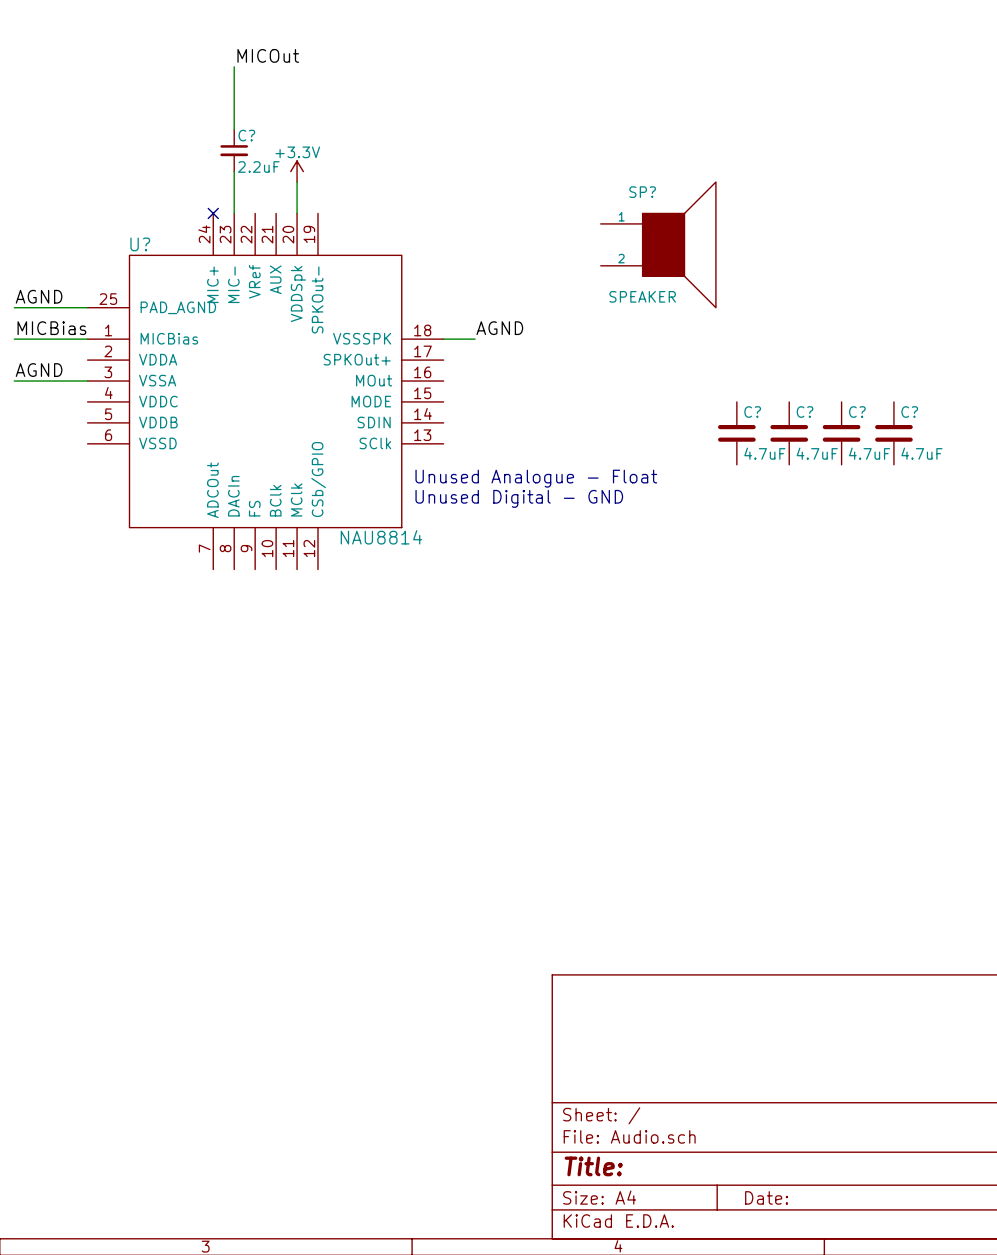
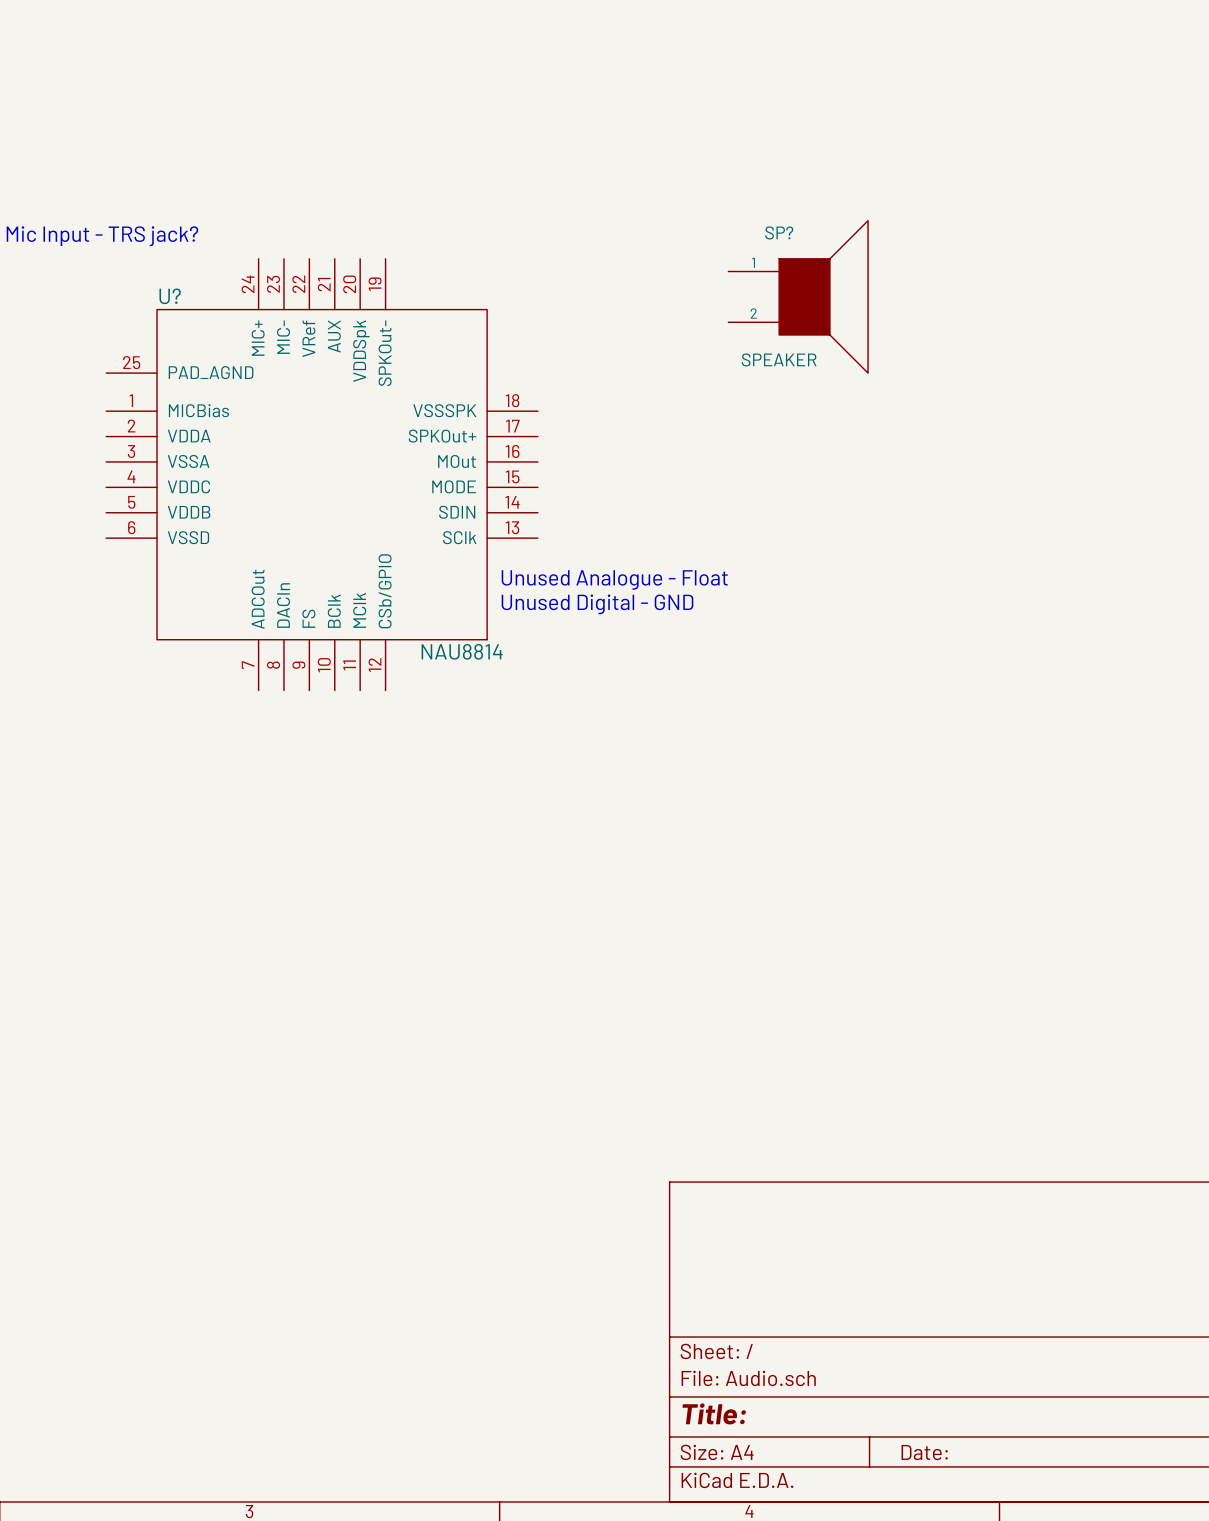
label: MICOut (268, 55) -> none
wire: (234, 66) (234, 129) -> none
C?: 2.2uF (234, 150) -> none
wire: (234, 171) (234, 213) -> none
power symbol: +3.3V (297, 171) -> none
wire: (297, 182) (297, 213) -> none
text: none -> Mic Input - TRS jack? (102, 236)
no-connect mark: (213, 213) -> none
label: AGND (39, 296) -> none
wire: (14, 307) (87, 307) -> none
label: MICBias (51, 328) -> none
label: AGND (499, 328) -> none
wire: (14, 339) (87, 339) -> none
wire: (443, 339) (475, 339) -> none
label: AGND (39, 370) -> none
wire: (14, 381) (87, 381) -> none
C?: 4.7uF (736, 433) -> none
C?: 4.7uF (789, 433) -> none
C?: 4.7uF (841, 433) -> none
C?: 4.7uF (893, 433) -> none

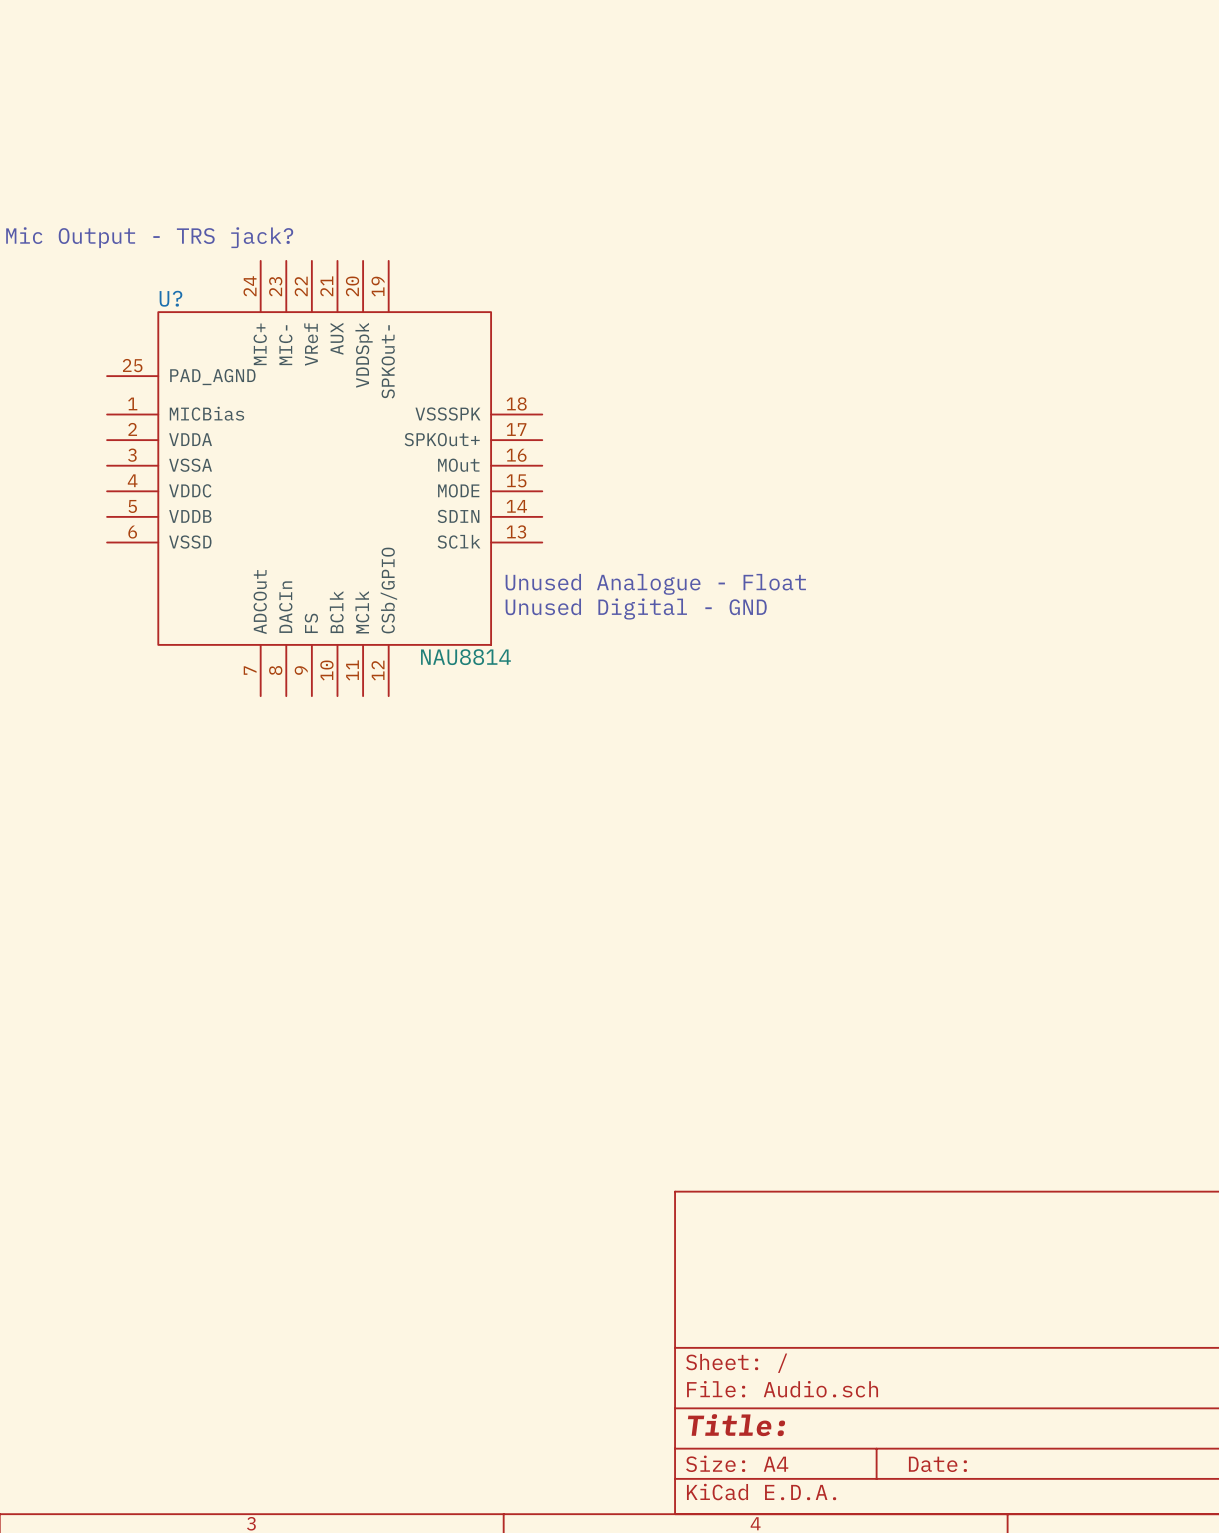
text: Mic Input - TRS jack? (102, 236) -> Mic Output - TRS jack? (149, 237)
SP?: SPEAKER (798, 296) -> none

